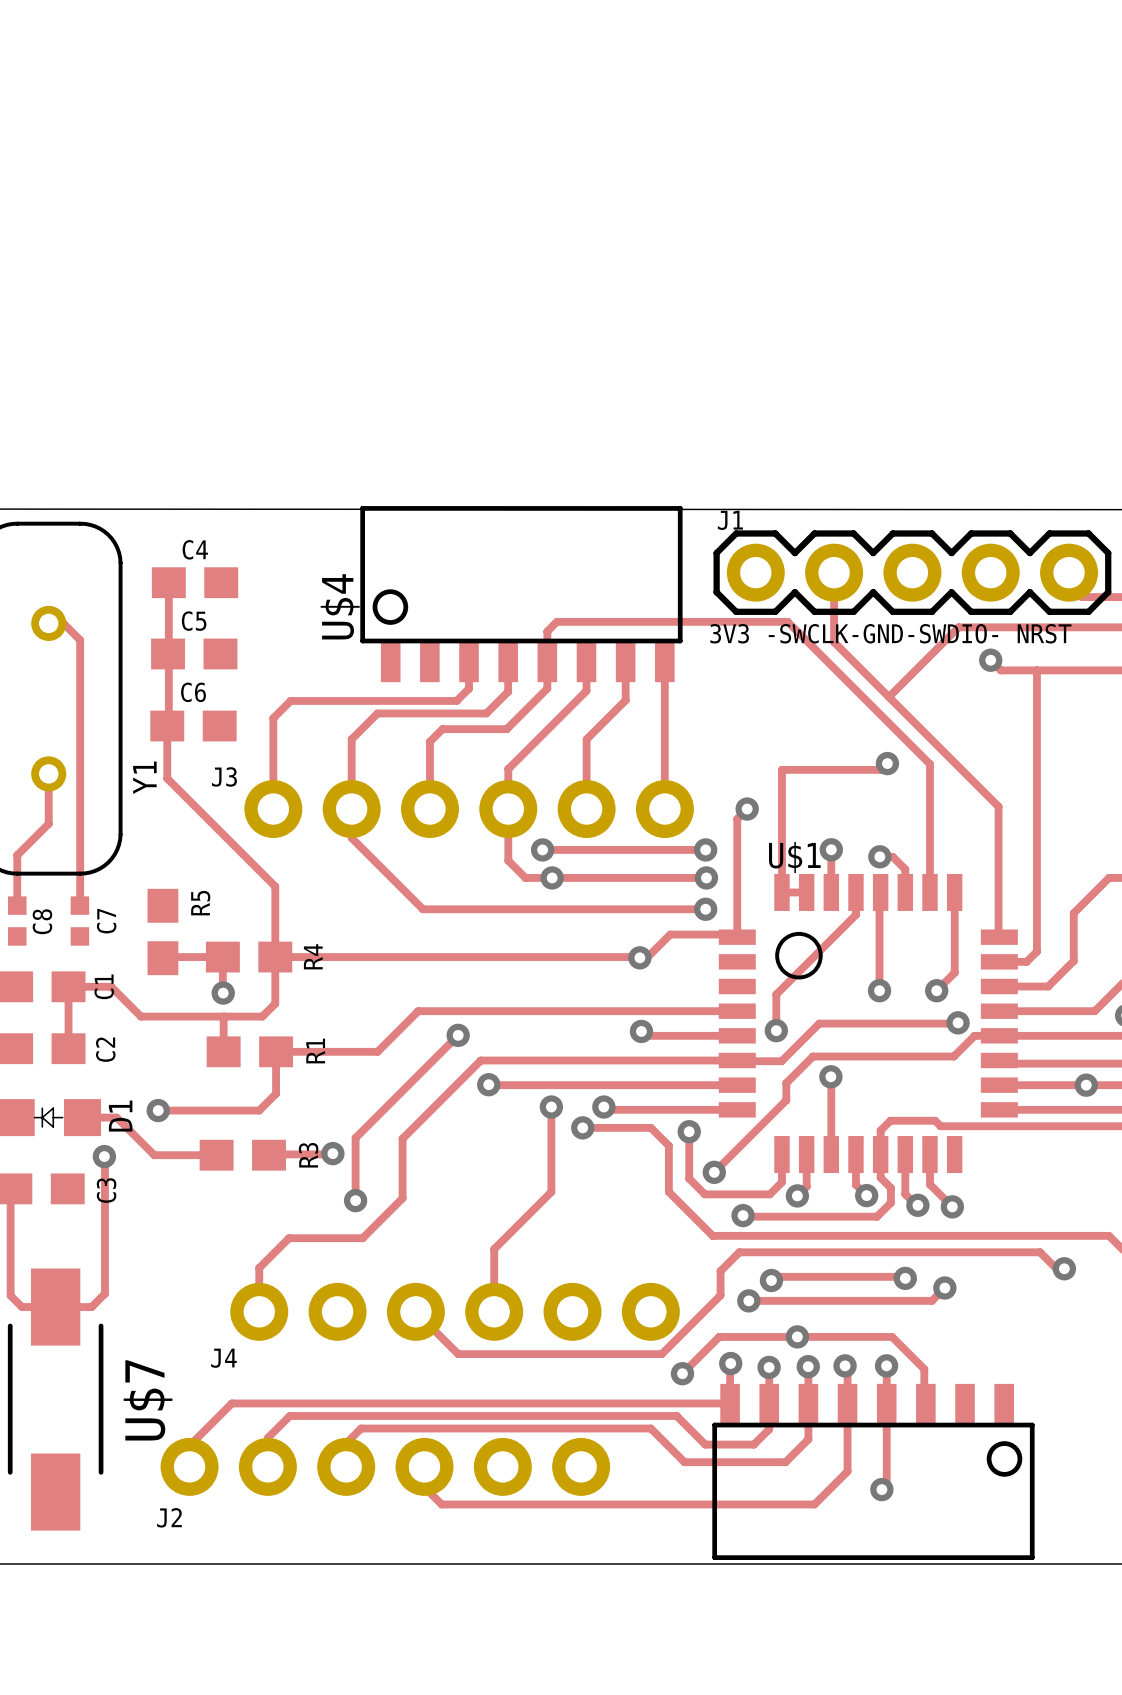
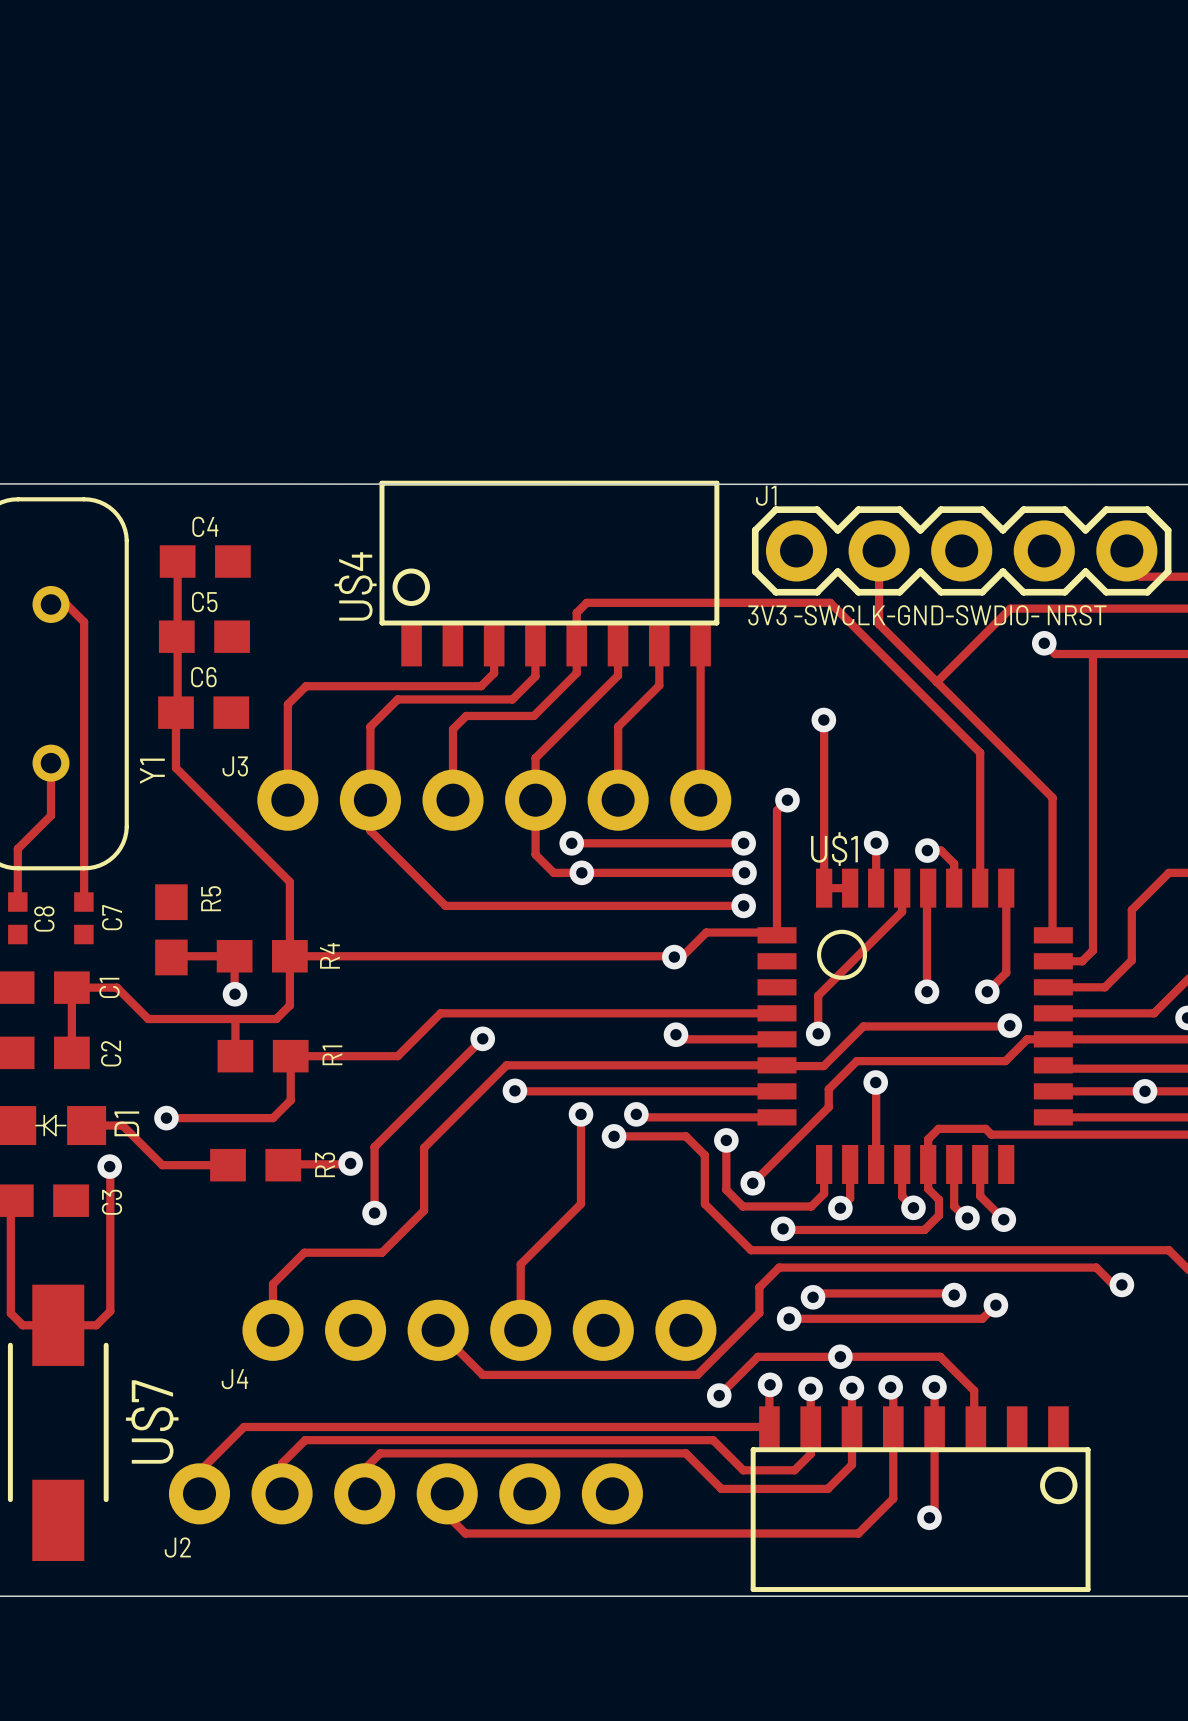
track: (887, 763) (881, 769) (781, 769) -> (824, 720) (824, 758)
via position: (887, 763) -> (823, 720)

